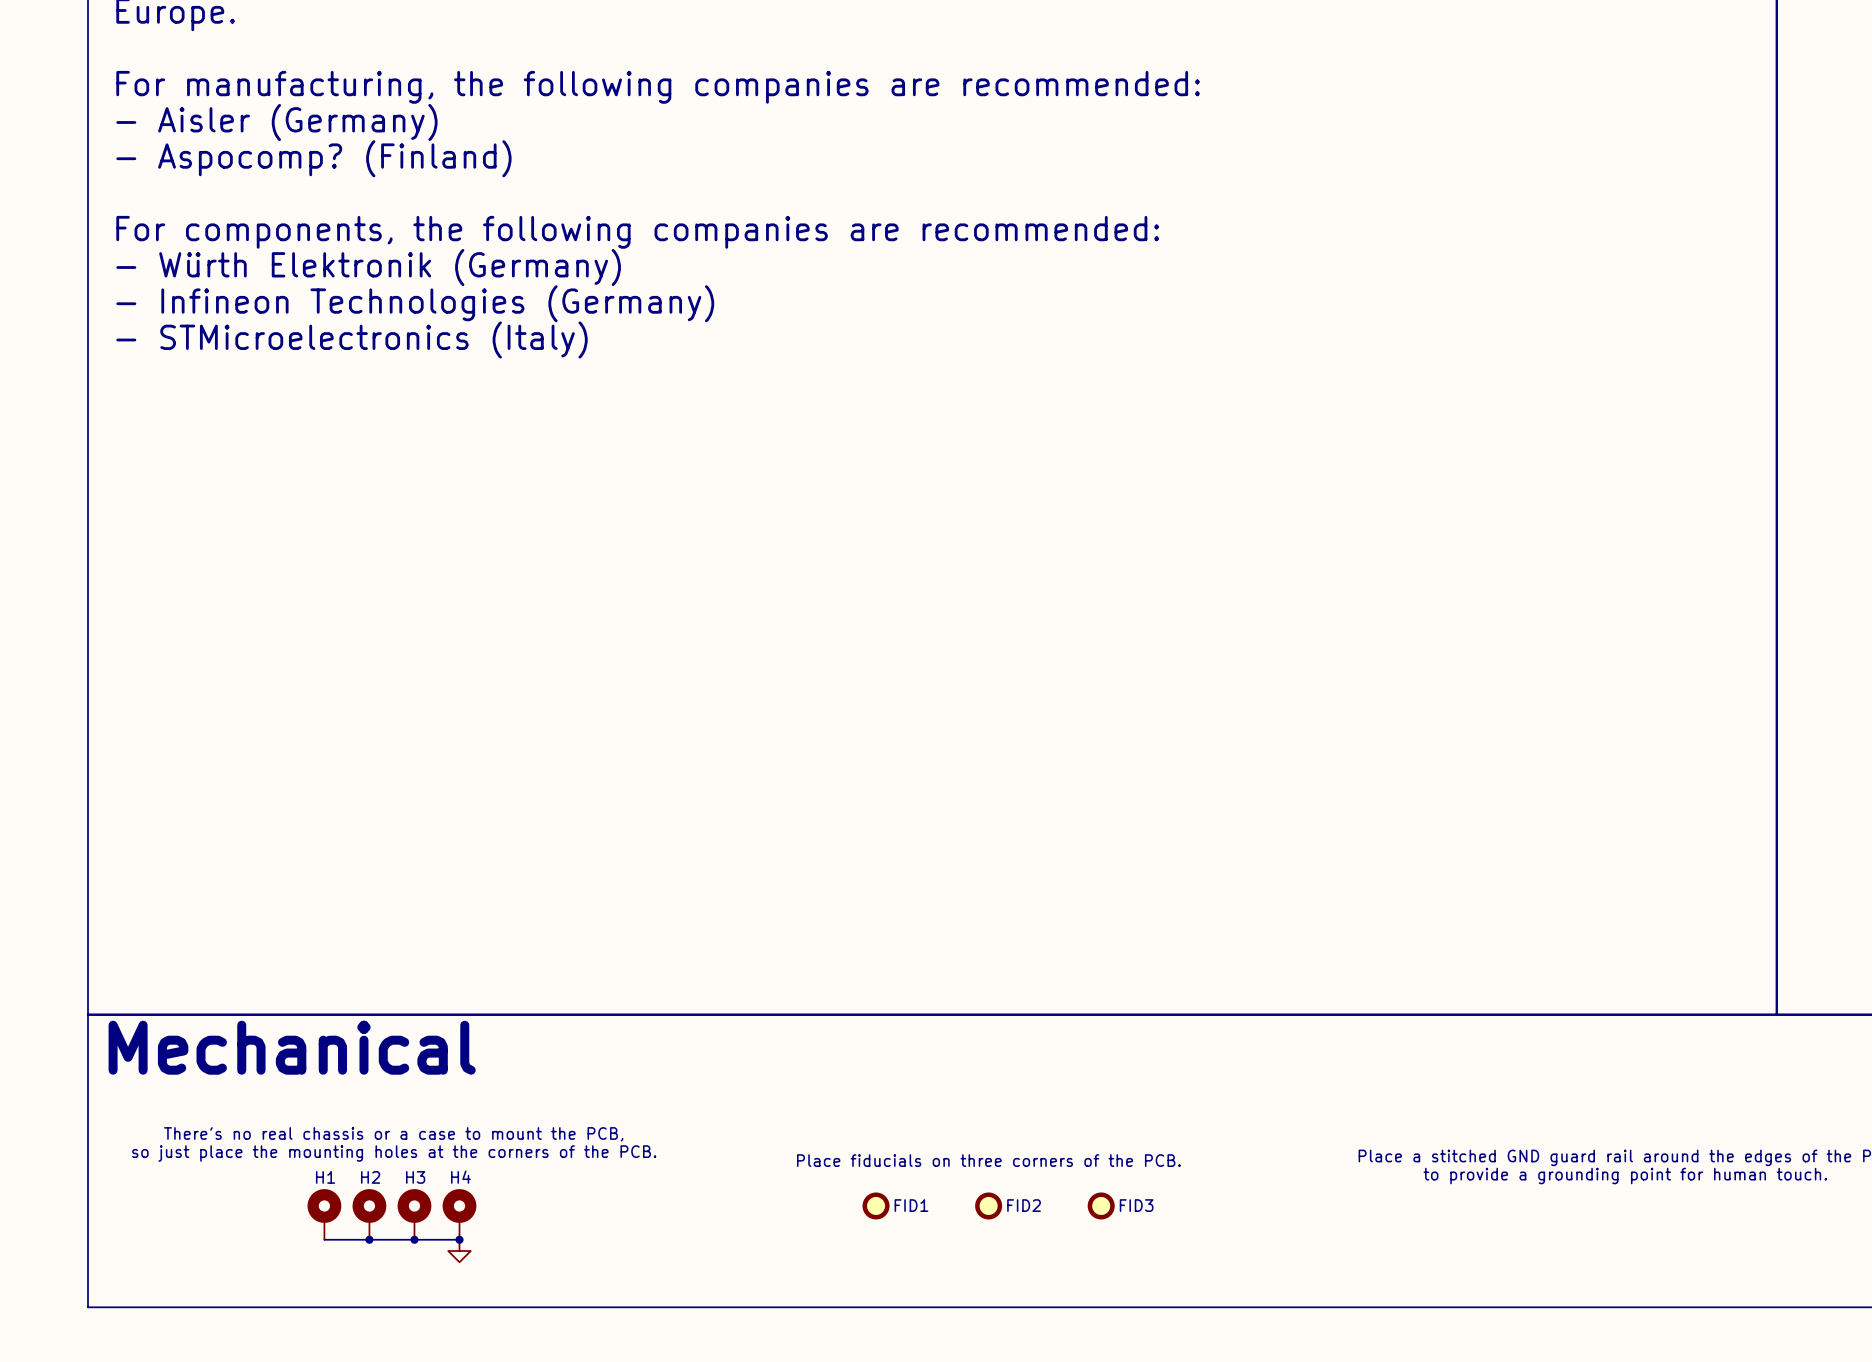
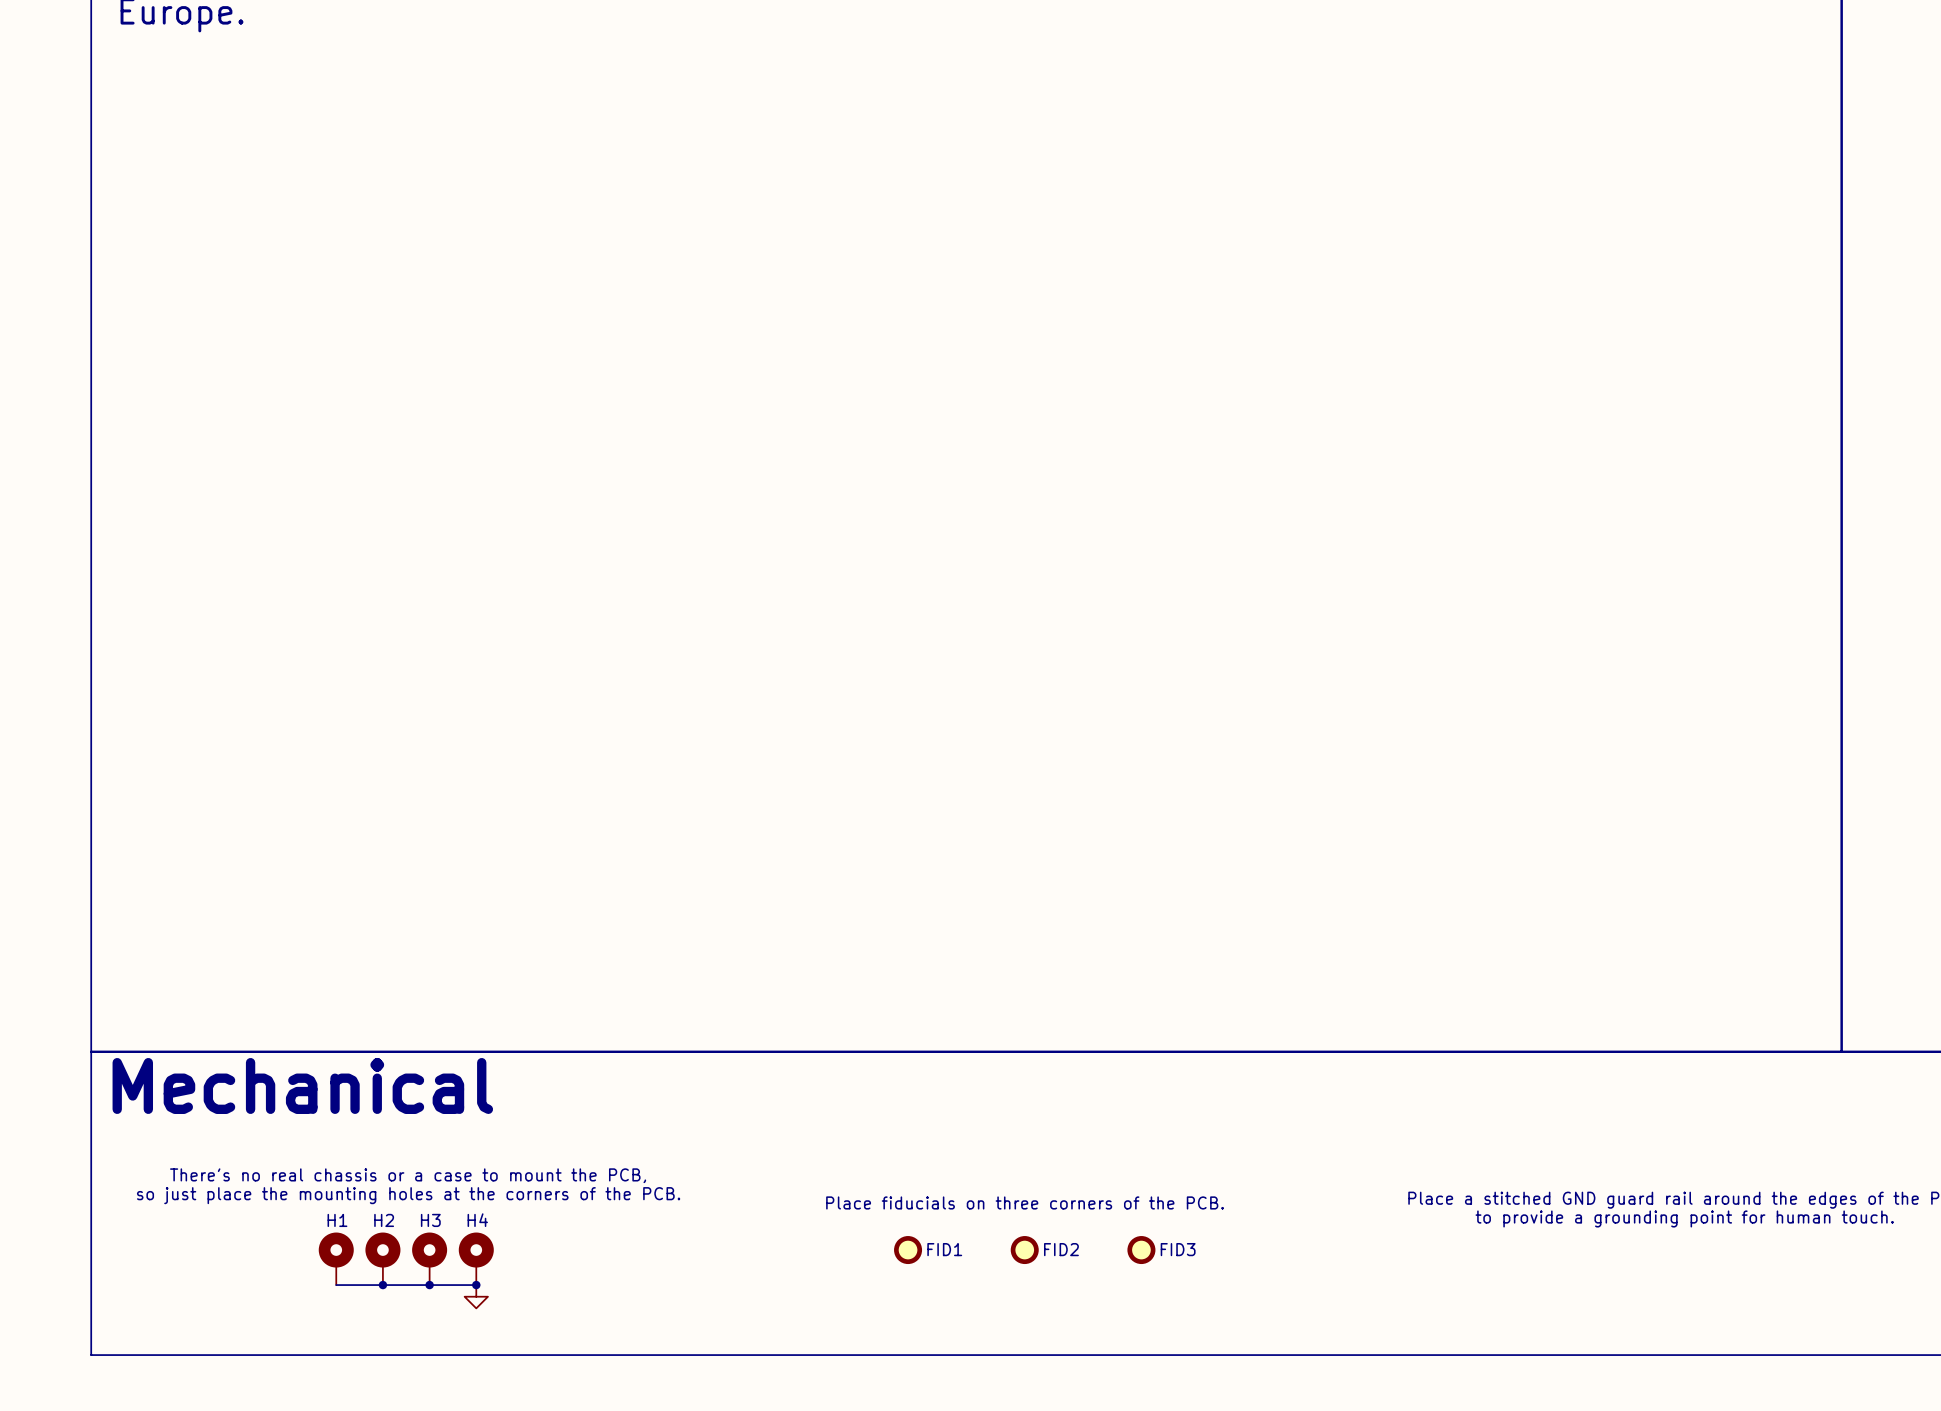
text: For manufacturing, the following companies are recommended: (658, 87) -> none
text: - Aisler (Germany) (276, 122) -> none
text: - Aspocomp? (Finland) (313, 158) -> none
text: For components, the following companies are recommended: (637, 232) -> none
text: - Würth Elektronik (Germany) (368, 267) -> none
text: - Infineon Technologies (Germany) (415, 303) -> none
text: - STMicroelectronics (Italy) (351, 339) -> none

